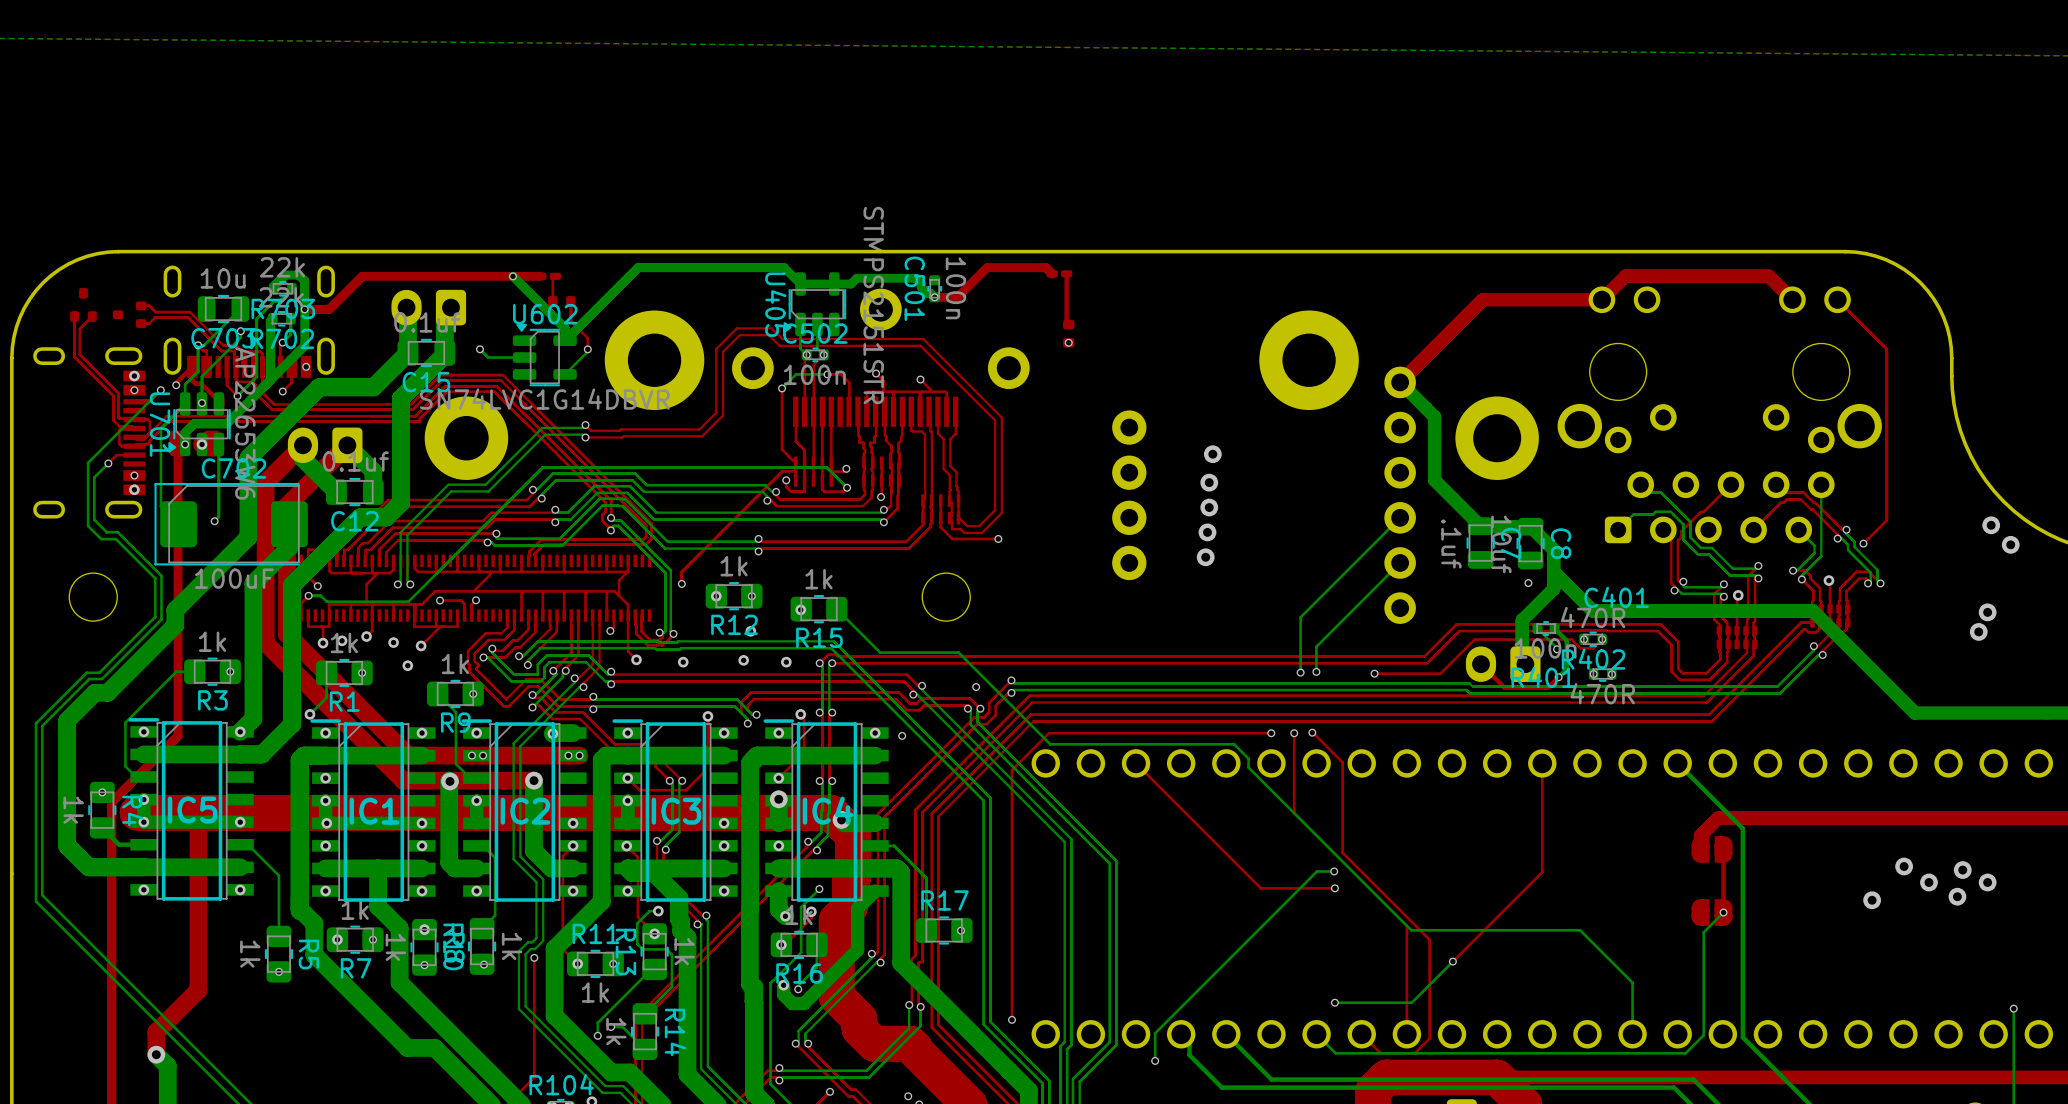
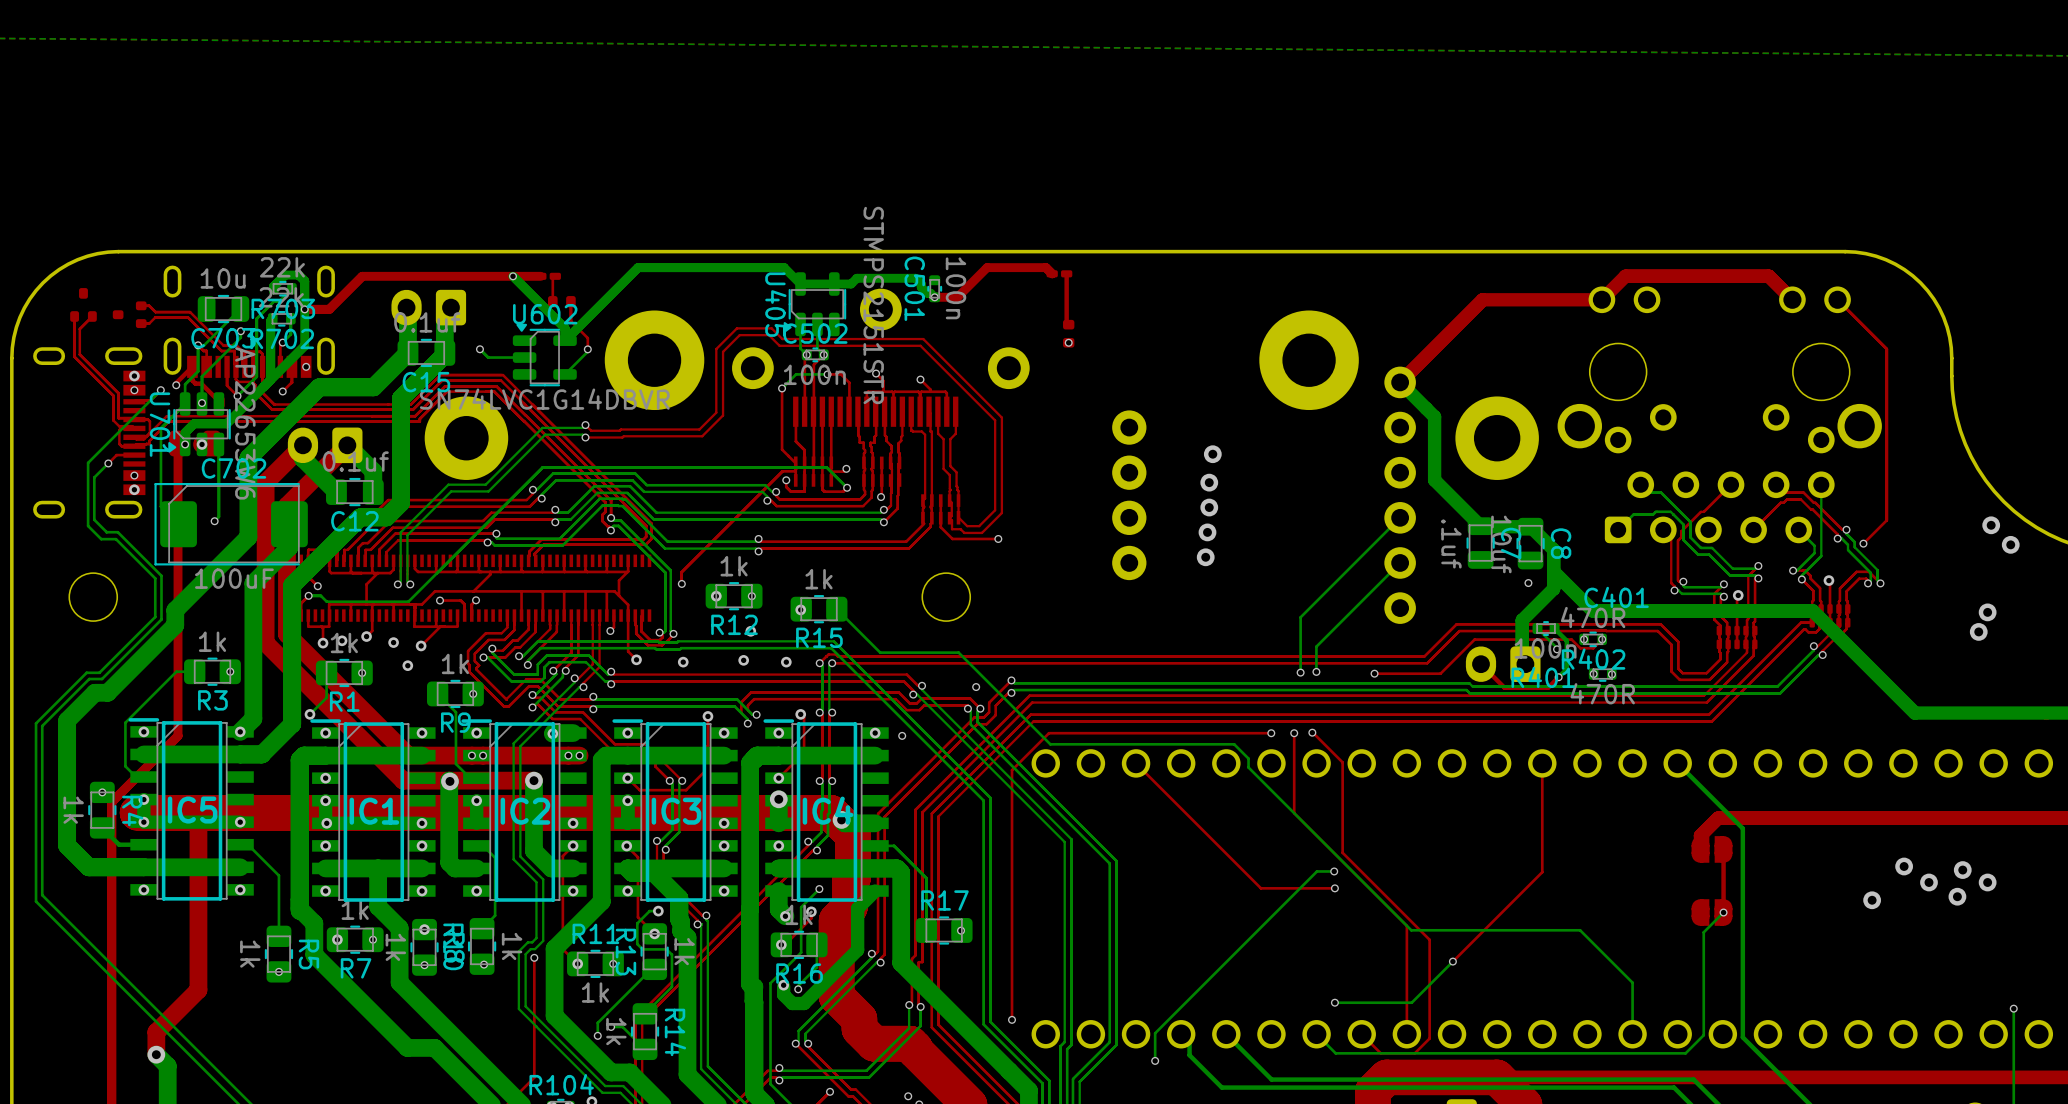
round board edge: none -> [1473, 414, 1522, 463]

